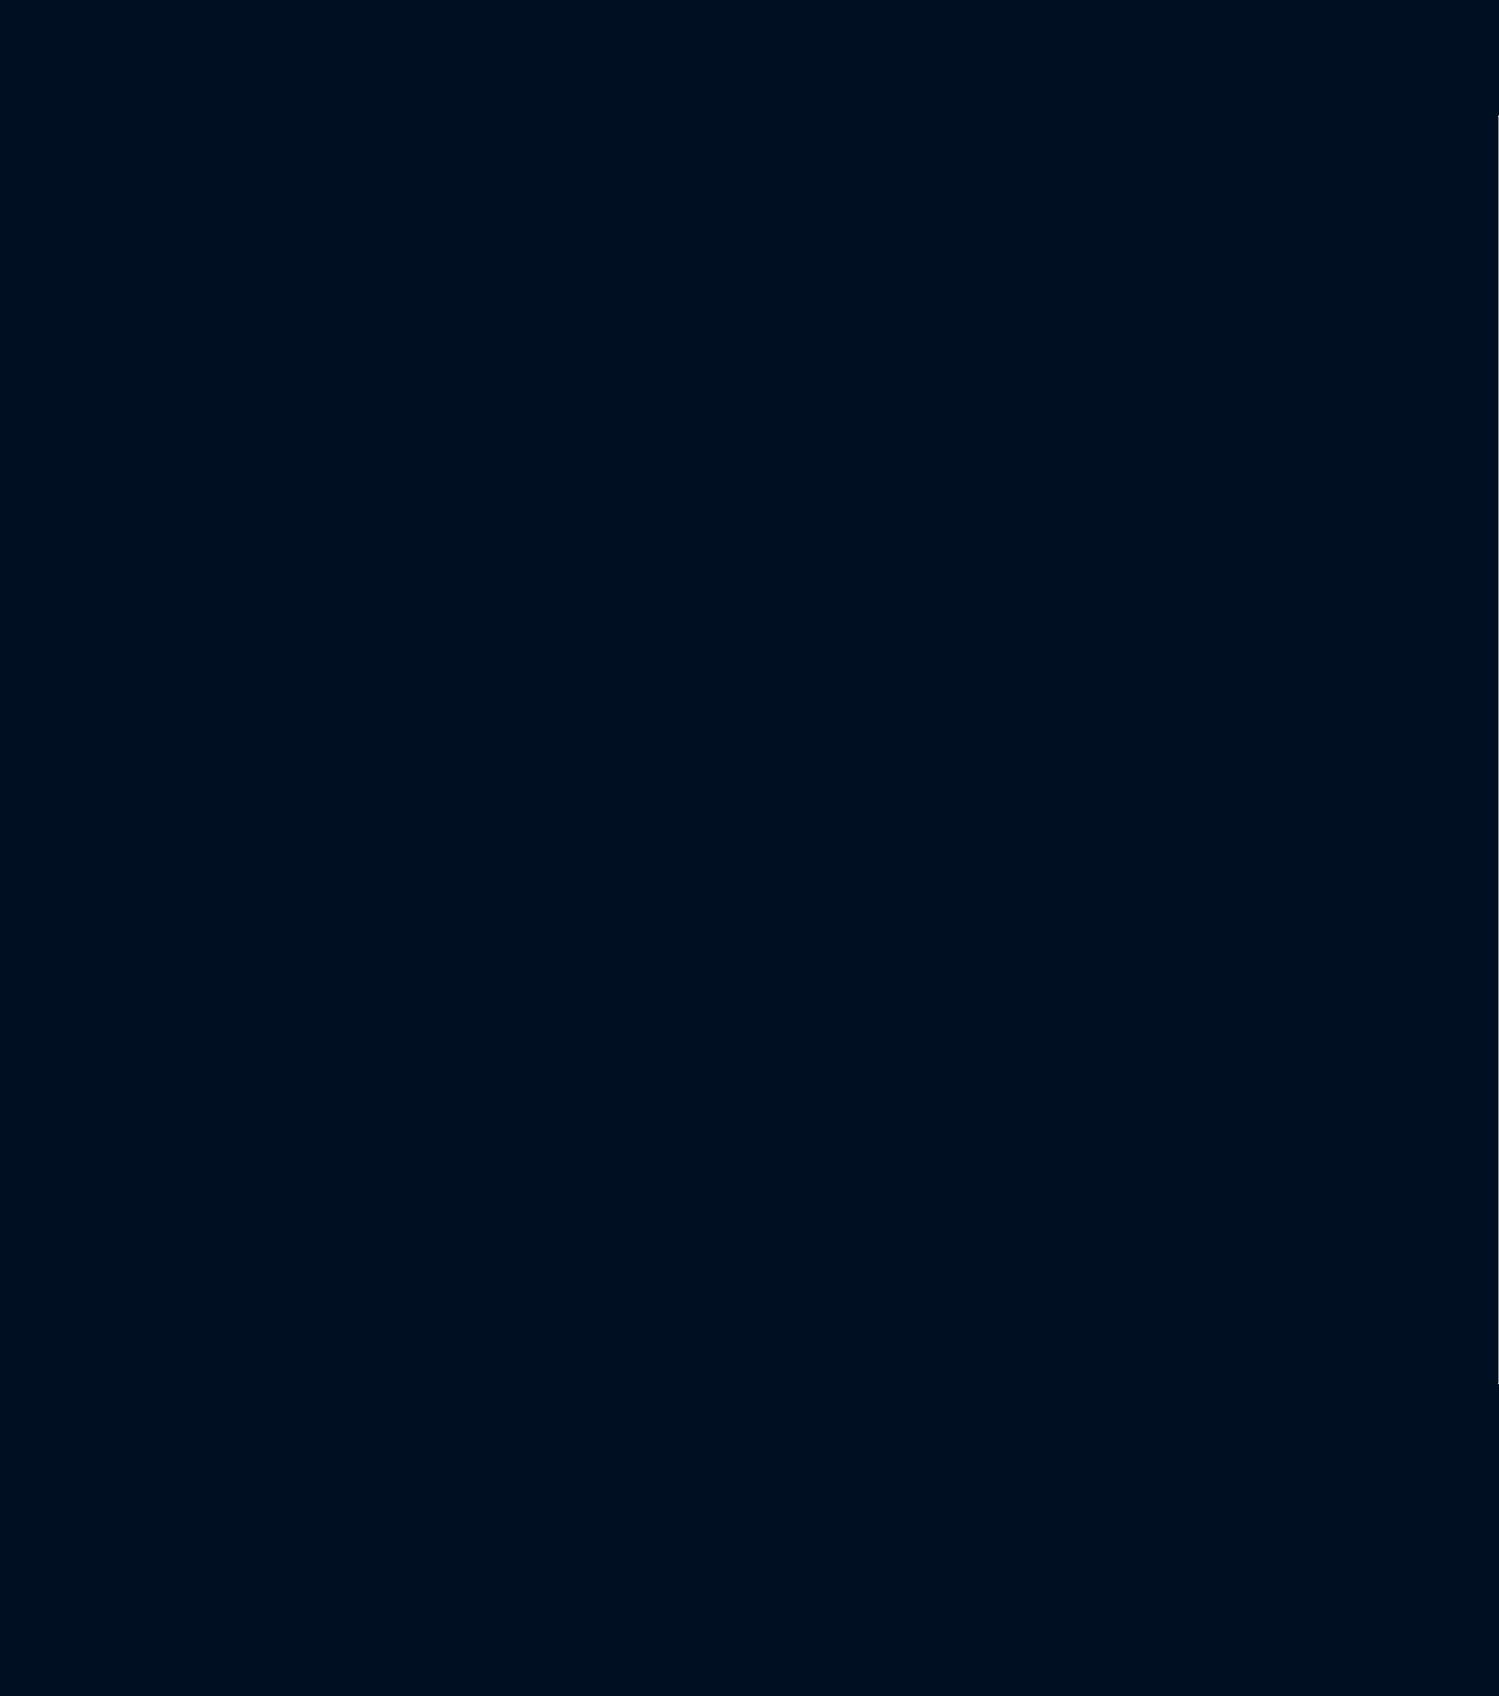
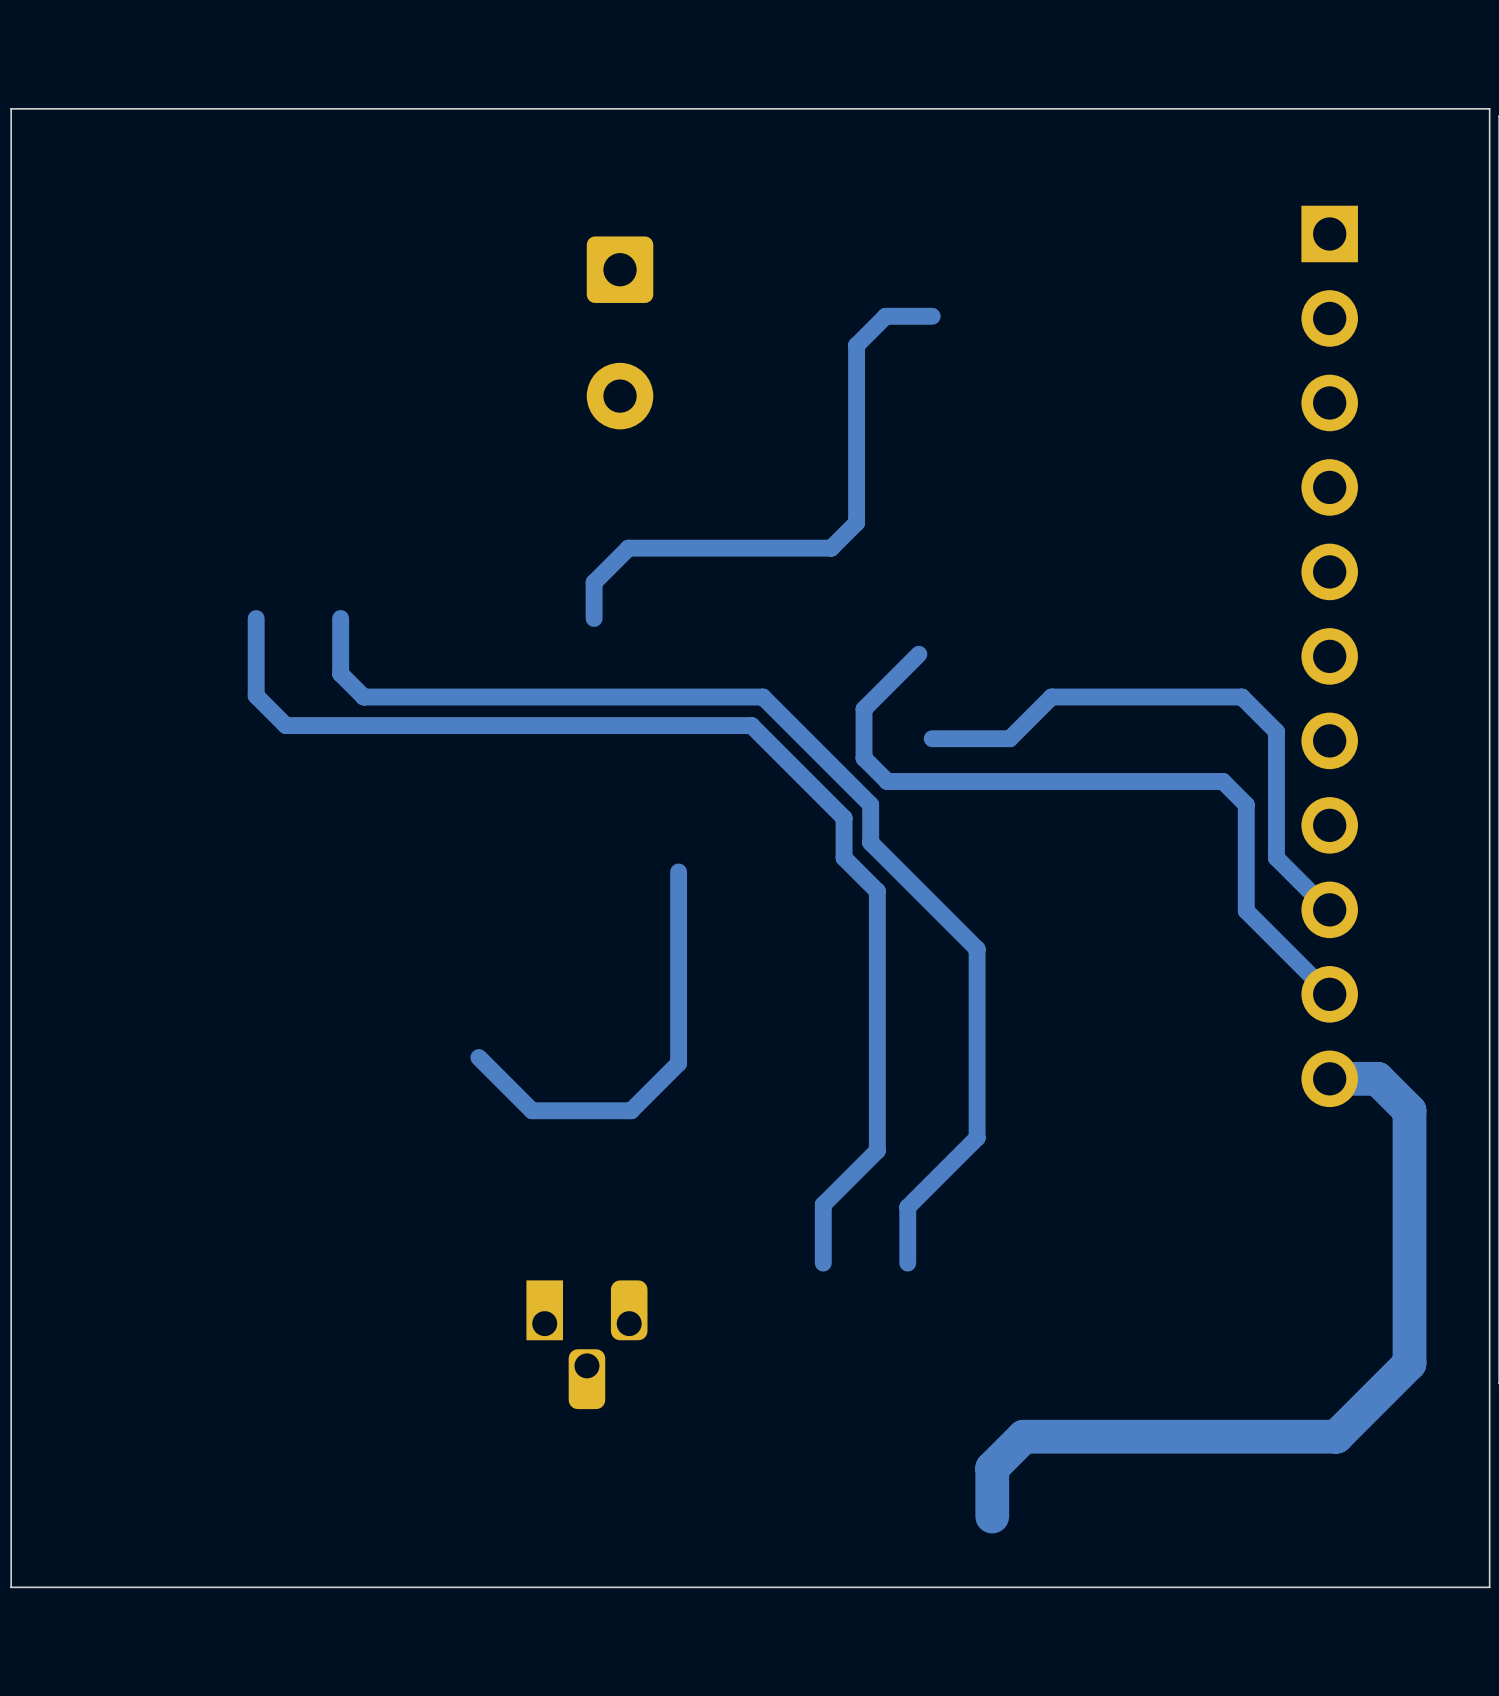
board edge: none -> (1489, 108) (11, 108) (11, 1587) (1489, 1587) (1489, 108)
track: none -> (932, 316) (885, 316) (856, 345) (856, 522) (831, 548) (628, 548) (594, 582) (594, 618)
part: none -> (620, 332)
track: none -> (256, 618) (256, 695) (285, 725) (751, 725) (844, 818) (844, 857) (877, 891) (877, 1150) (823, 1204) (823, 1263)
track: none -> (340, 618) (340, 673) (363, 697) (762, 697) (870, 804) (870, 842) (977, 949) (977, 1137) (907, 1207) (907, 1263)
track: none -> (918, 654) (864, 709) (864, 758) (887, 781) (1223, 781) (1246, 804) (1246, 910) (1329, 994)
part: none -> (1329, 656)
track: none -> (932, 738) (1009, 738) (1051, 697) (1241, 697) (1276, 731) (1276, 857) (1328, 909)
track: none -> (678, 871) (678, 1063) (631, 1110) (532, 1110) (478, 1057)
track: none -> (1329, 1078) (1377, 1078) (1409, 1110) (1409, 1363) (1336, 1436) (1023, 1436) (992, 1468) (992, 1516)
part: none -> (586, 1344)

